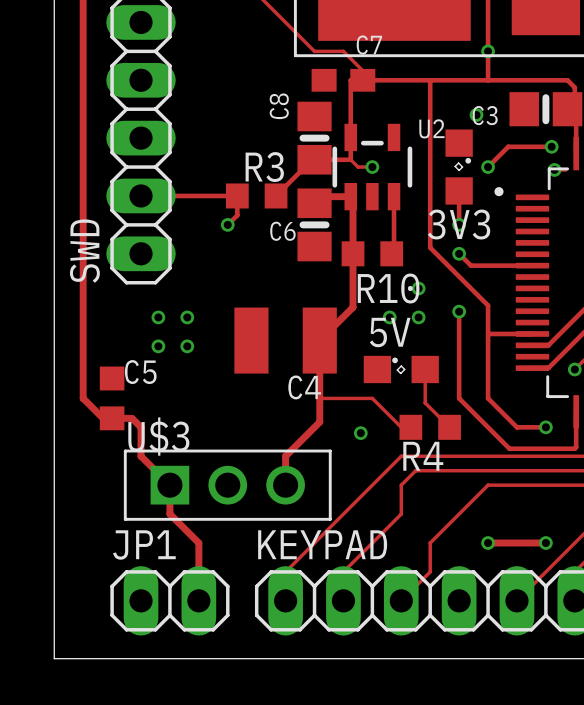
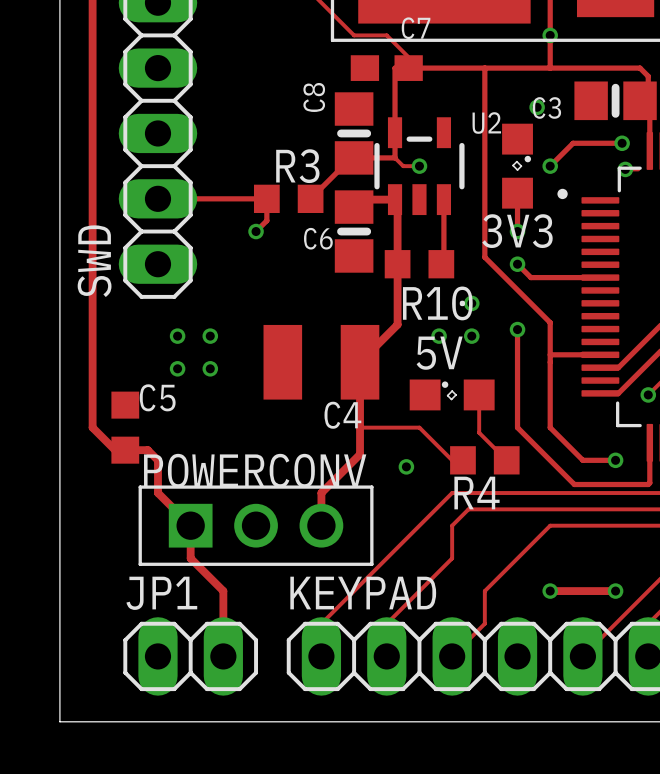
U$3 name: U$3 (158, 436) -> POWERCONV (255, 470)

